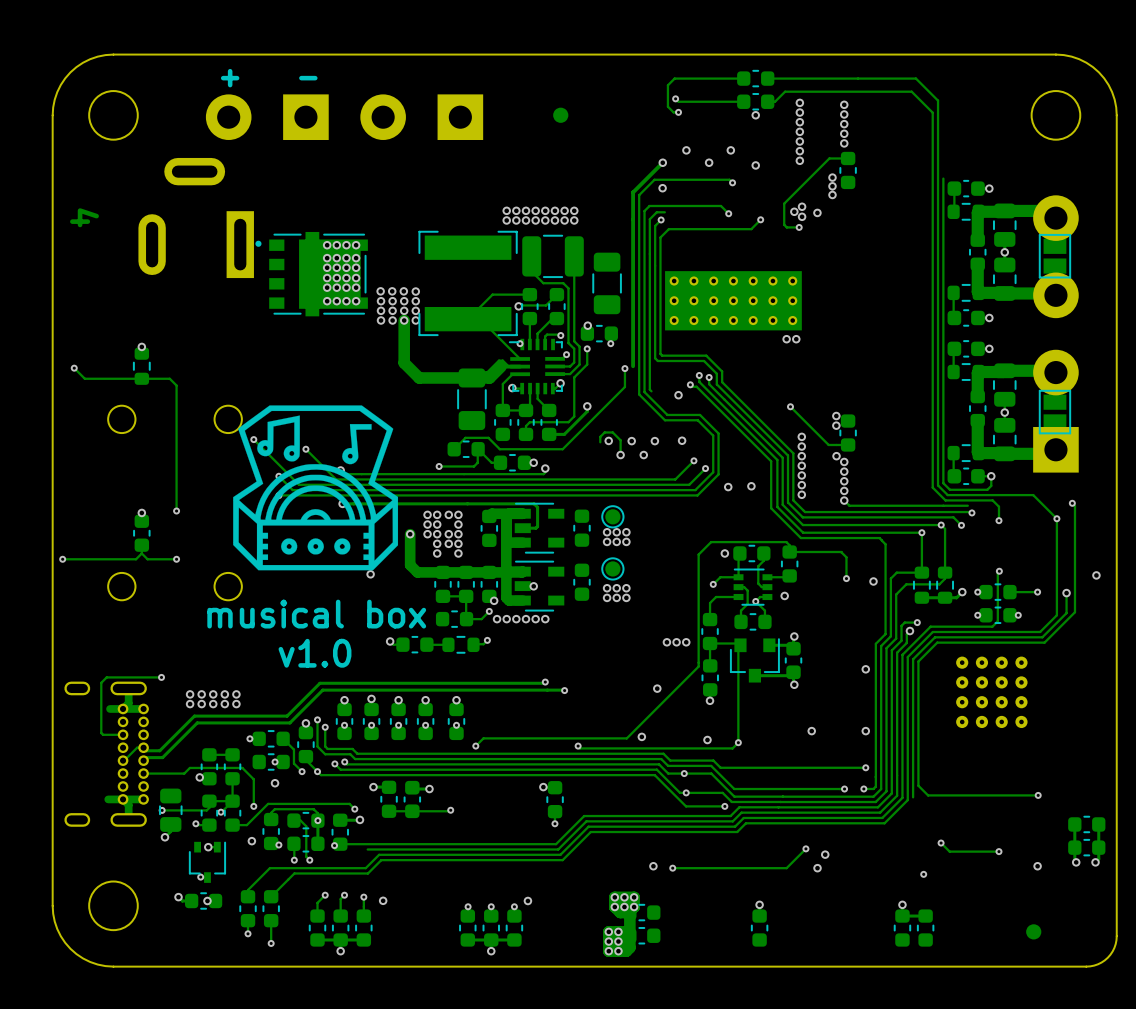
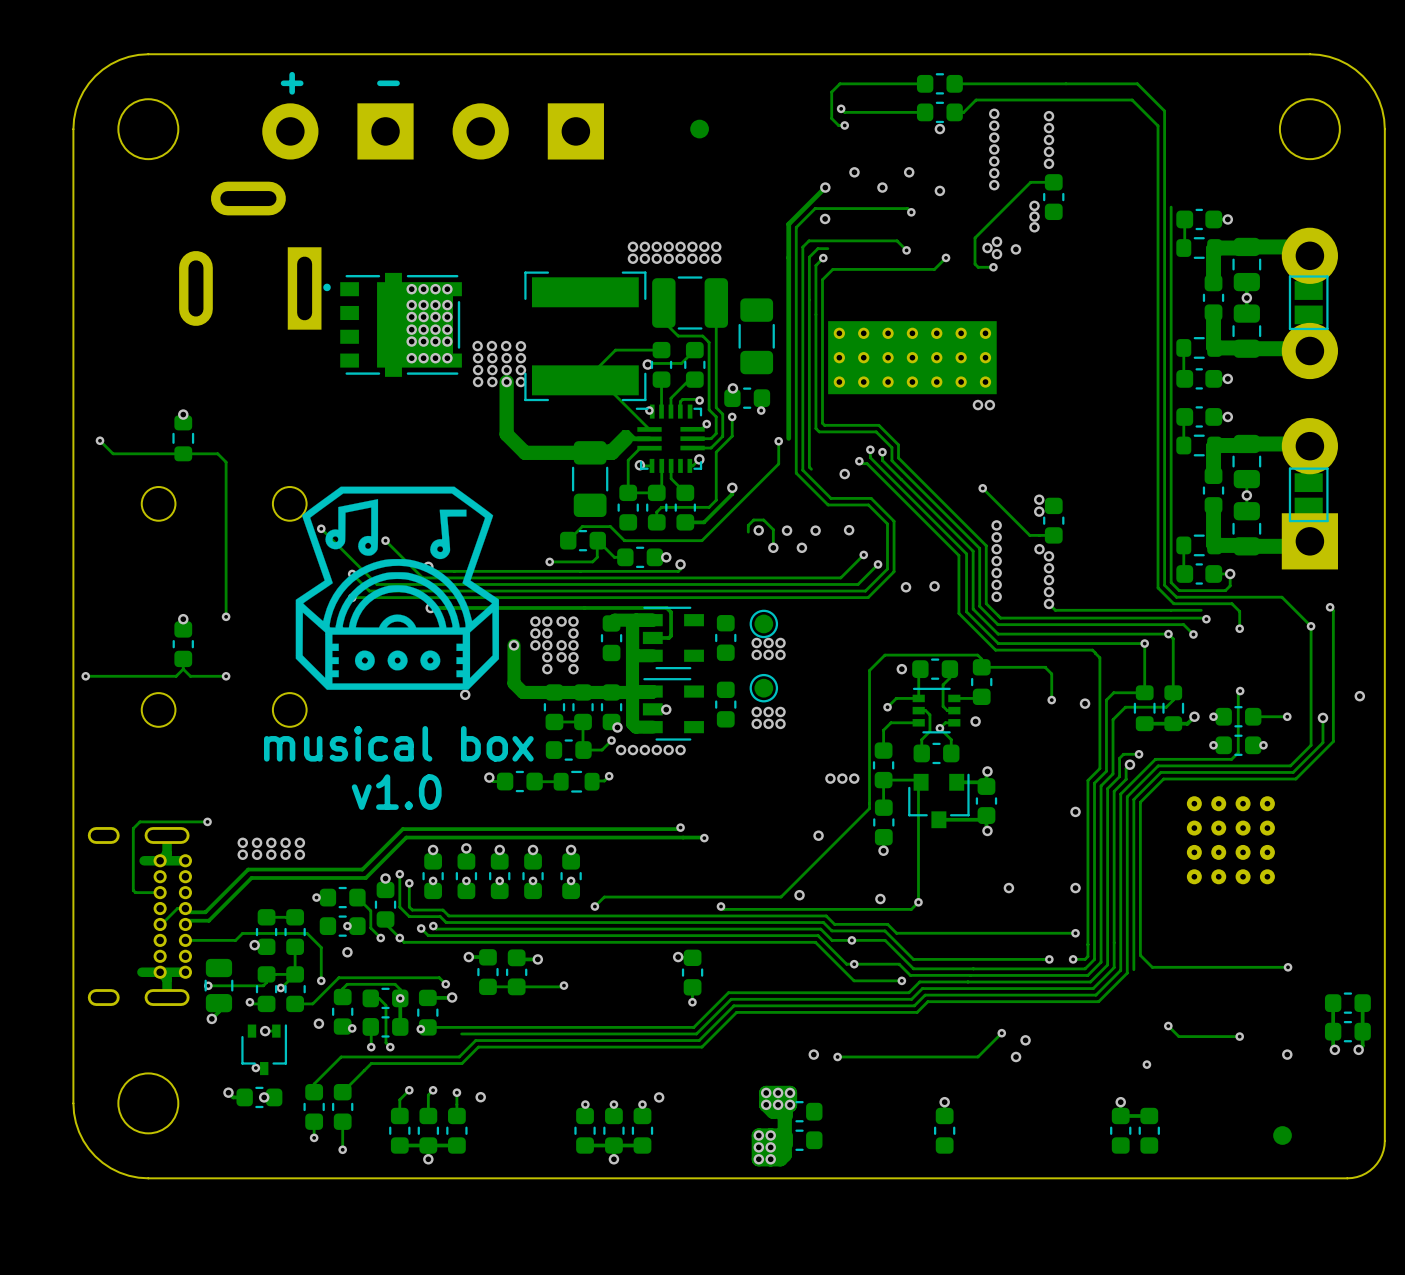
text: 4 (84, 217) -> none

